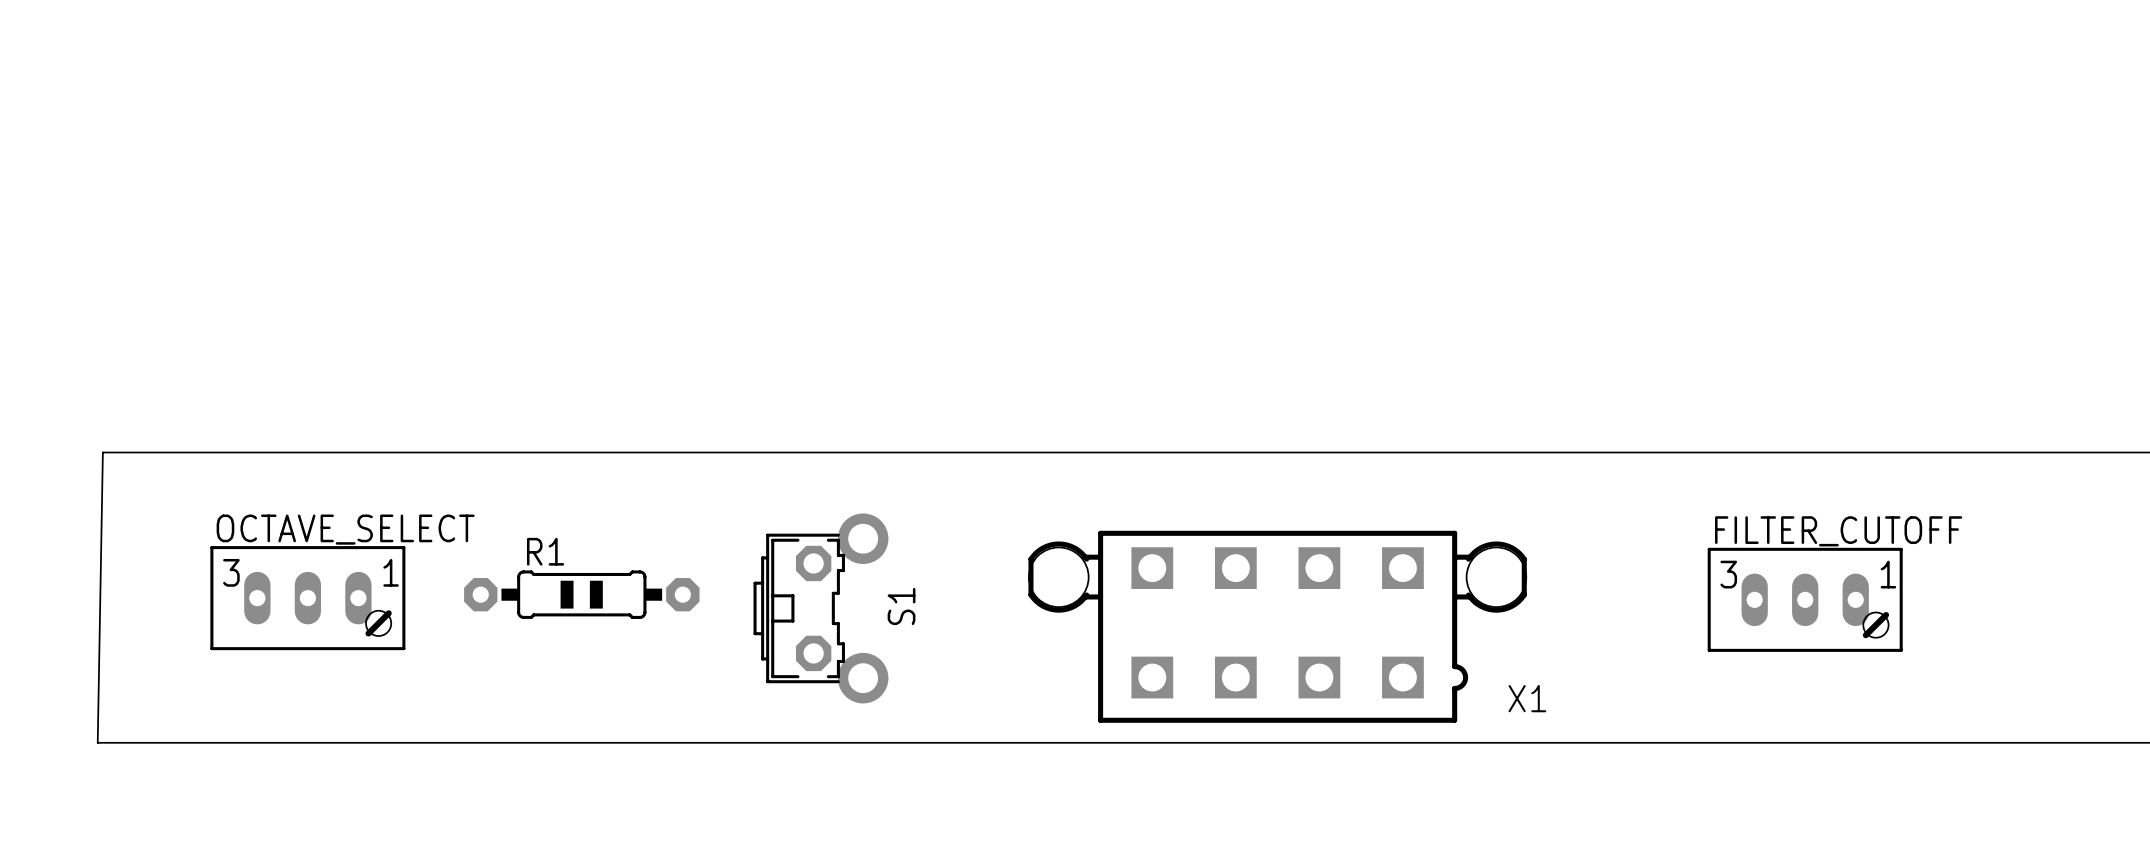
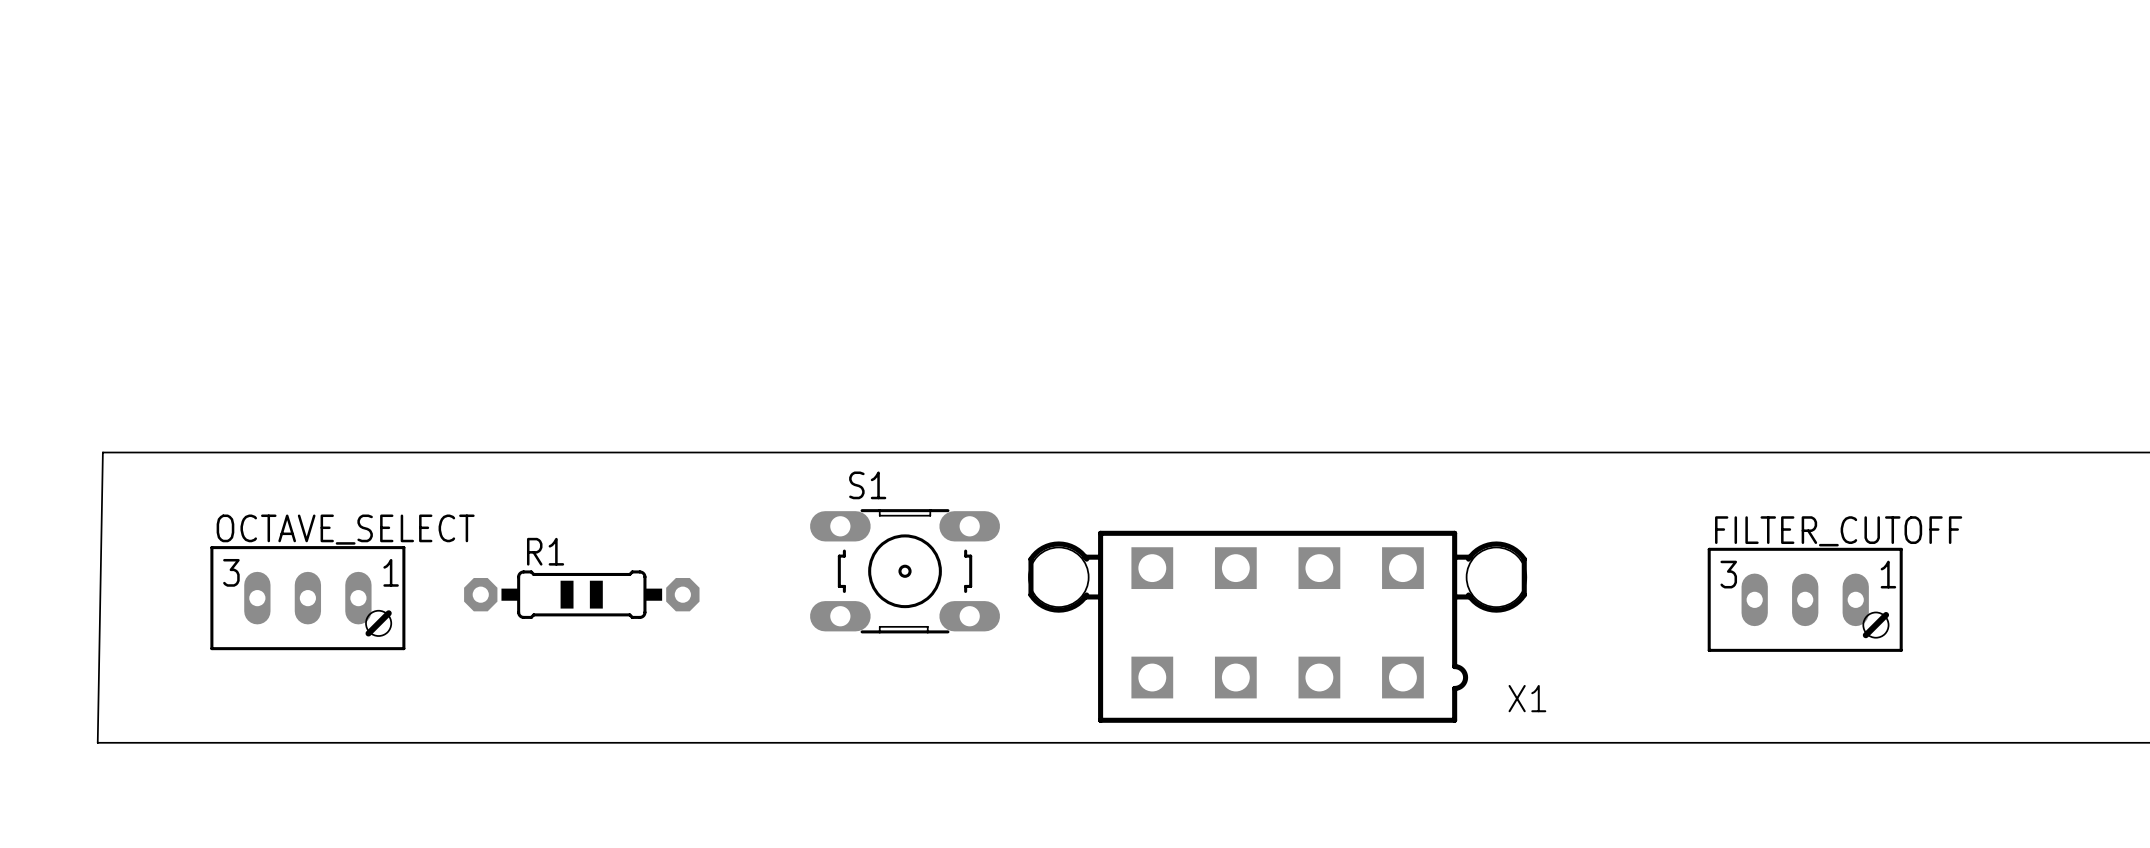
S1 footprint: [753, 513, 889, 704] -> [810, 509, 1001, 634]
S1 name position: S1 (901, 606) -> S1 (867, 485)

